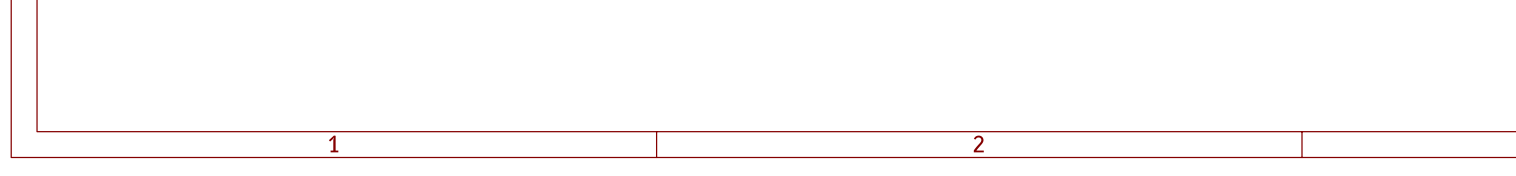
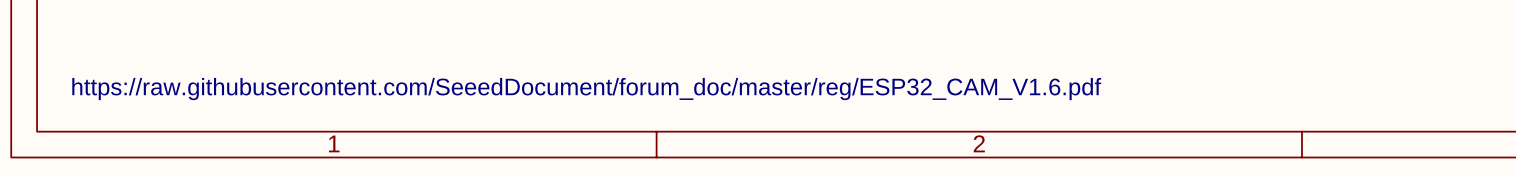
text: none -> https://raw.githubusercontent.com/SeeedDocument/forum_doc/master/reg/ESP32_CAM_V1.6.pdf (586, 89)

